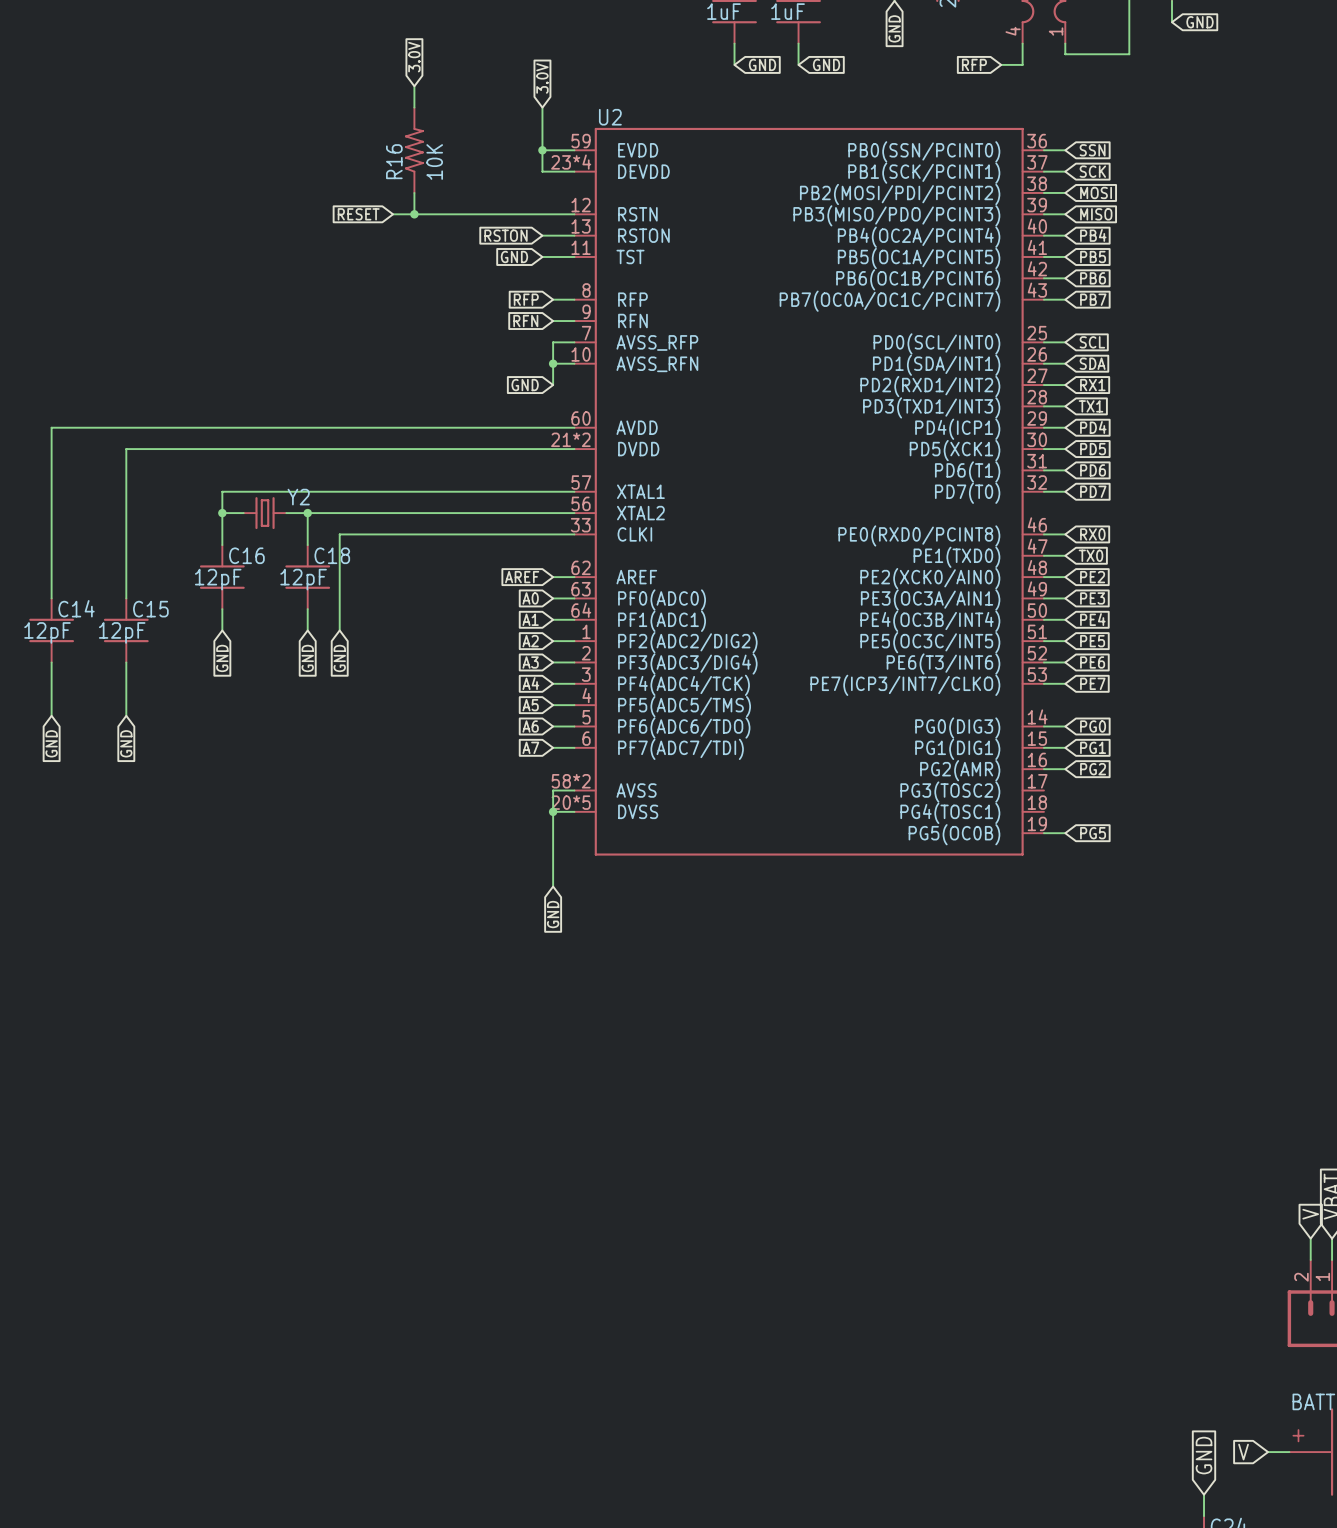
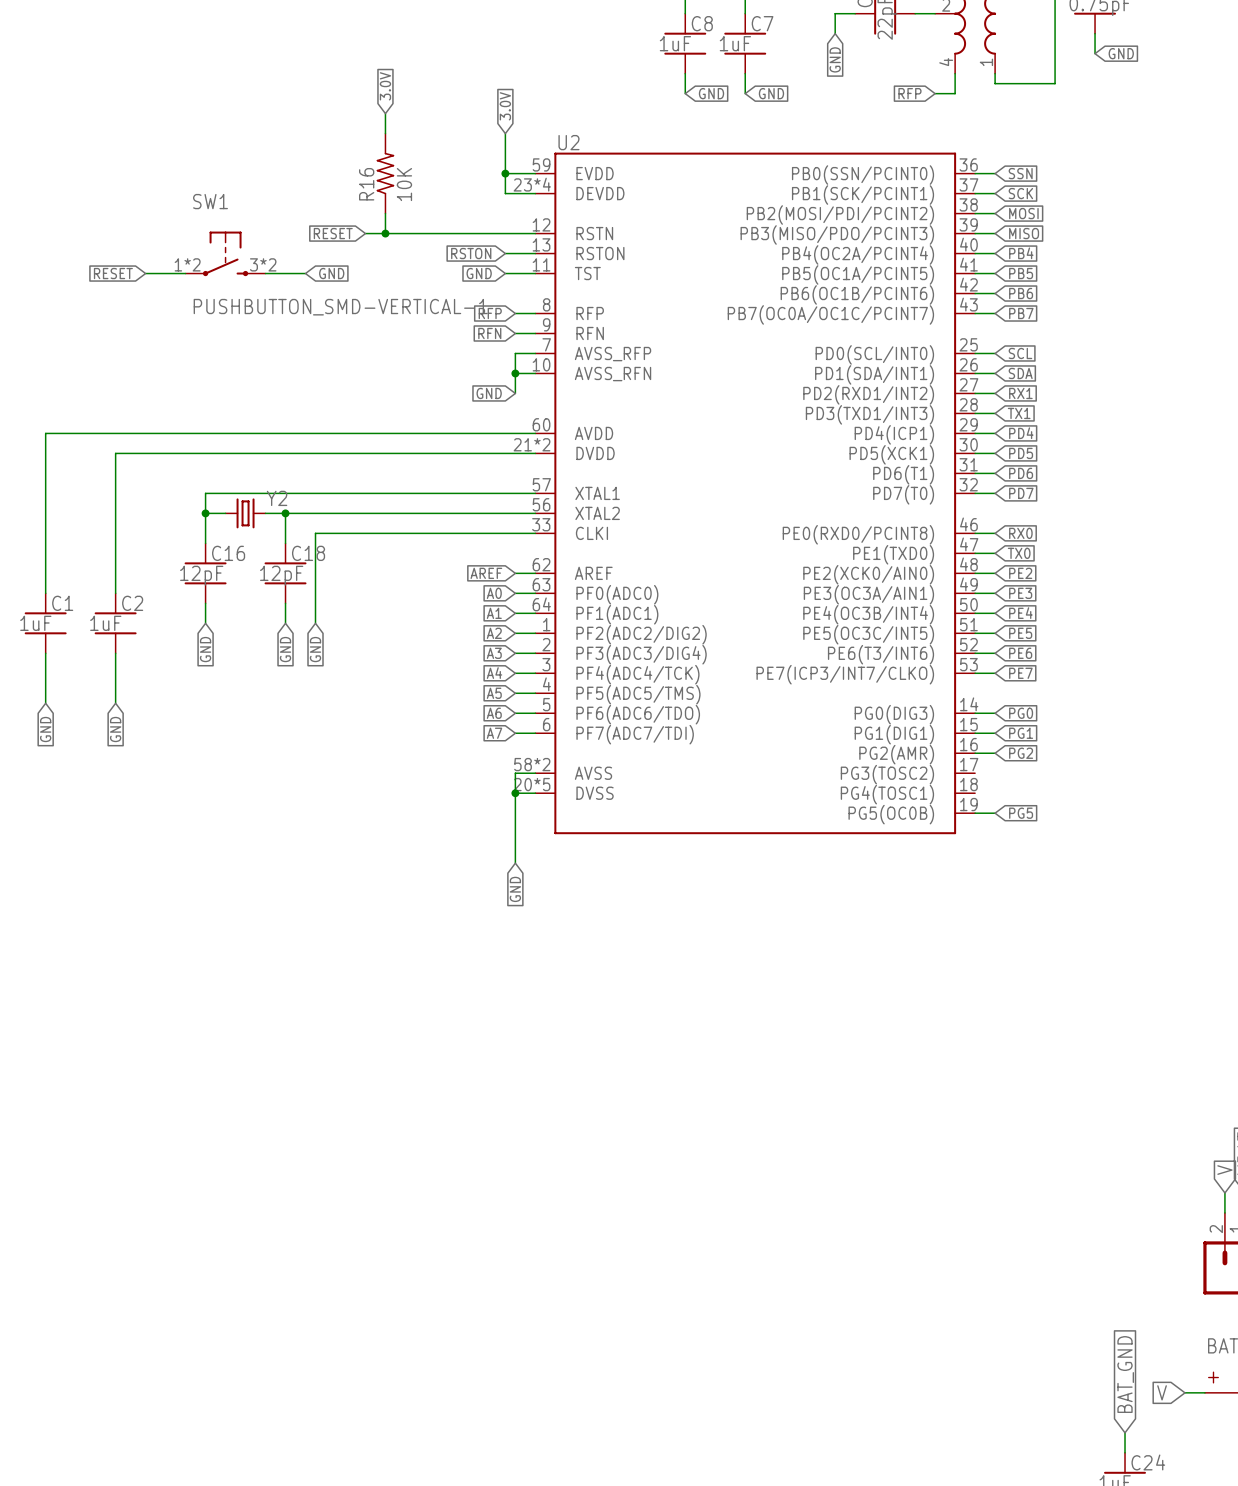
SW1: none -> PUSHBUTTON_SMD-VERTICAL-1 (225, 253)
global label: none -> RESET (113, 273)
wire: none -> (145, 273) (185, 273)
wire: none -> (265, 273) (305, 273)
global label: none -> GND (331, 273)
C14 name: C14 (76, 608) -> C1 (62, 603)
C15 name: C15 (150, 609) -> C2 (132, 603)
C14 value: 12pF (47, 632) -> 1uF (35, 623)
C15 value: 12pF (122, 632) -> 1uF (105, 623)
global label: GND (1204, 1455) -> BAT_GND (1125, 1374)

